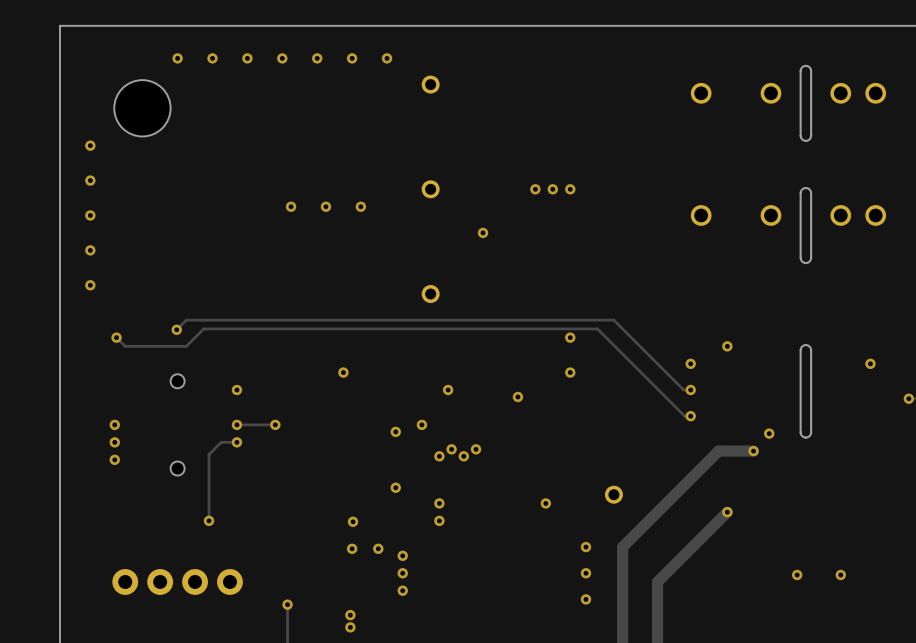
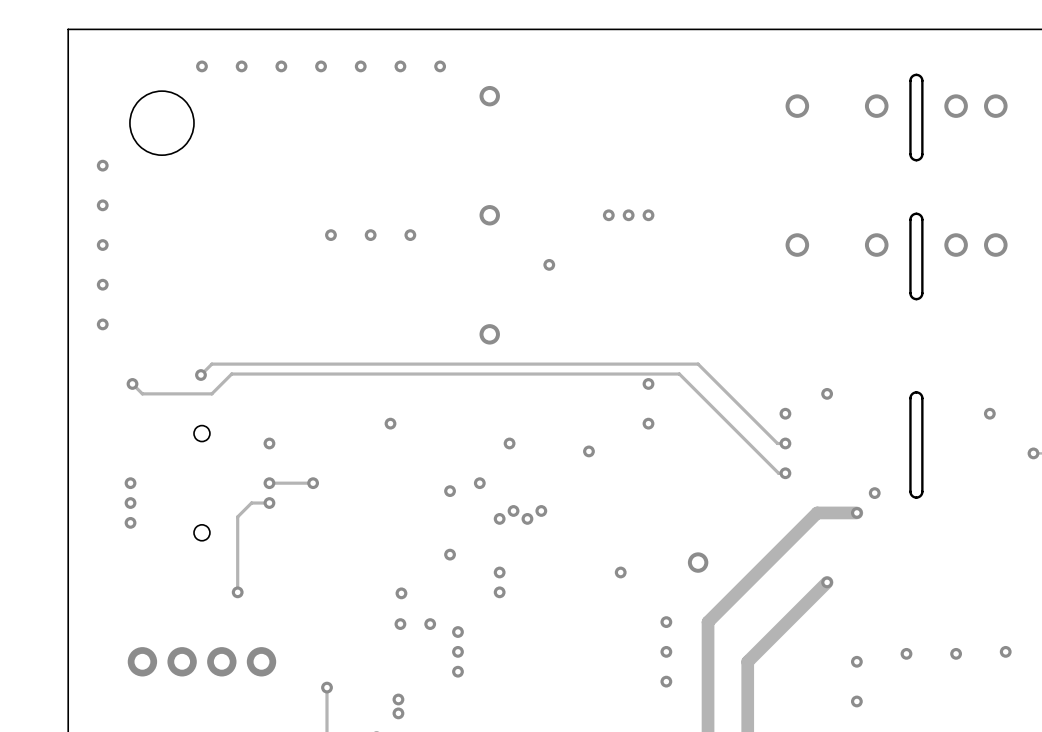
via: none -> (1005, 651)
via: none -> (856, 661)
via: none -> (856, 701)

